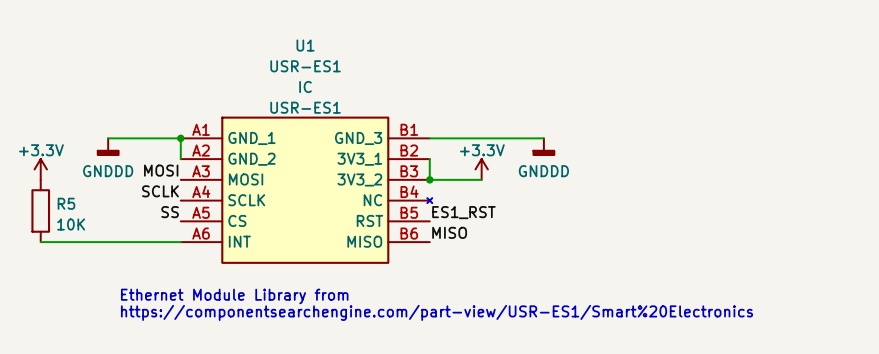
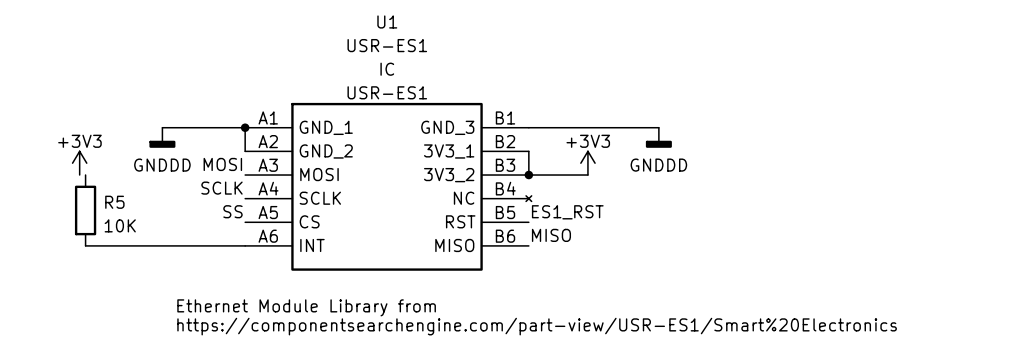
power symbol: +3.3V (40, 169) -> +3V3 (79, 163)
power symbol: +3.3V (481, 169) -> +3V3 (587, 163)

